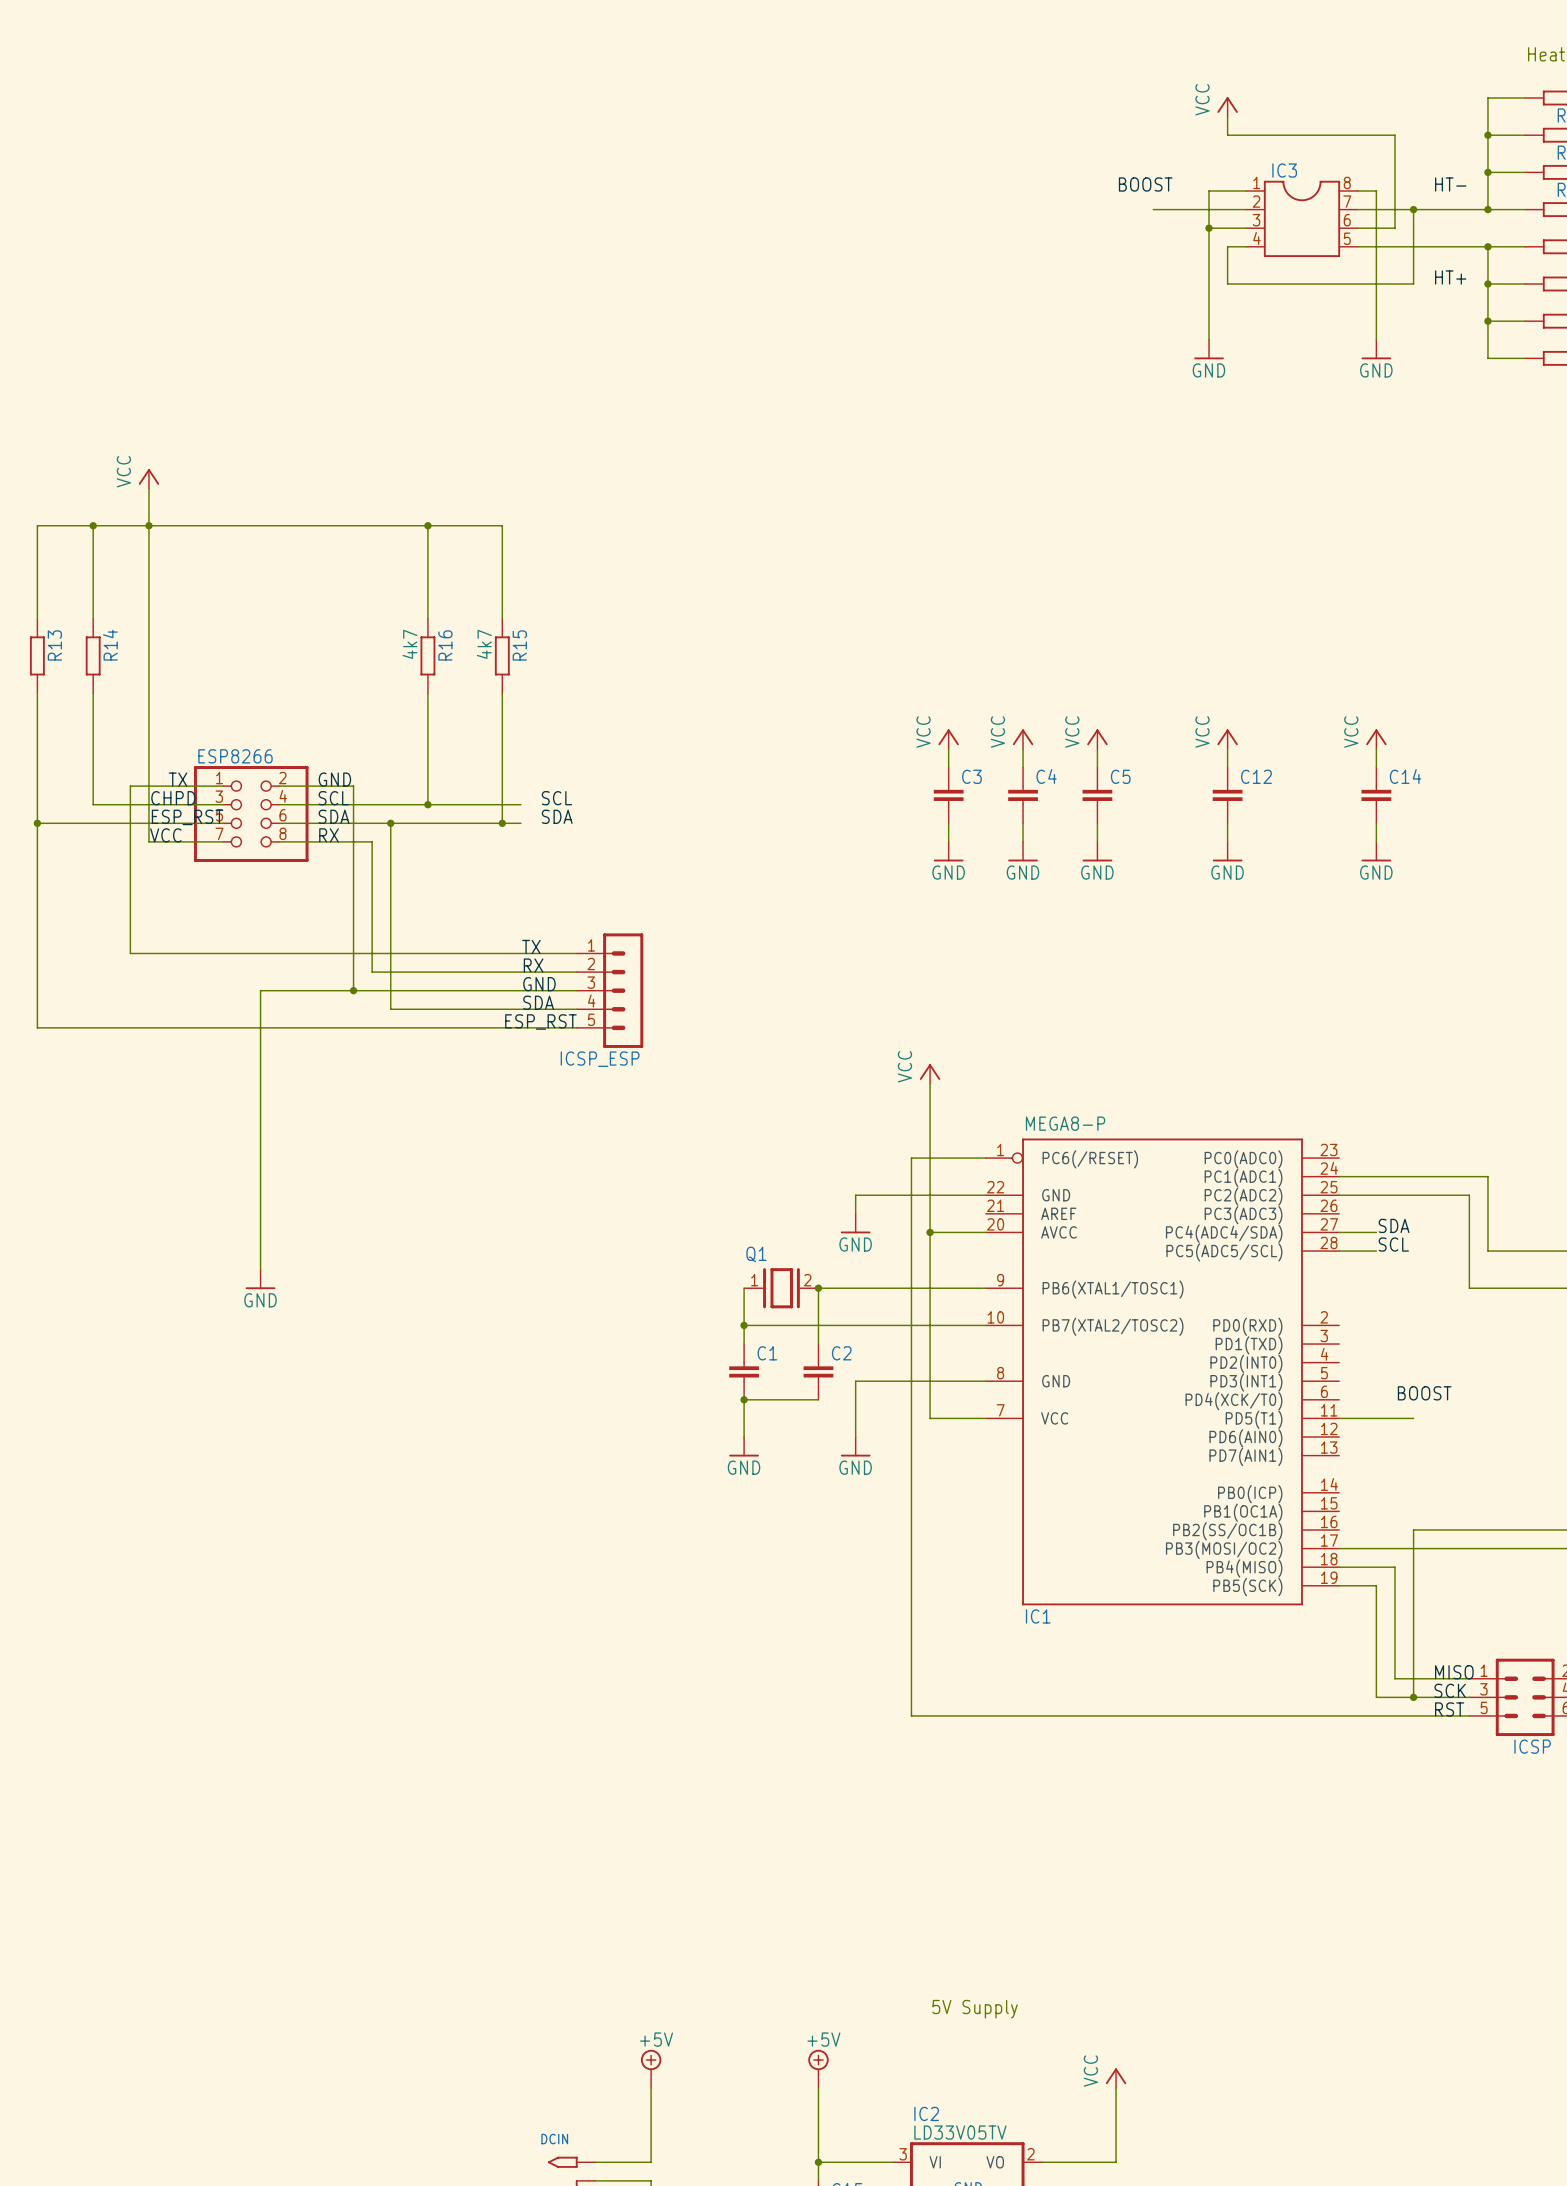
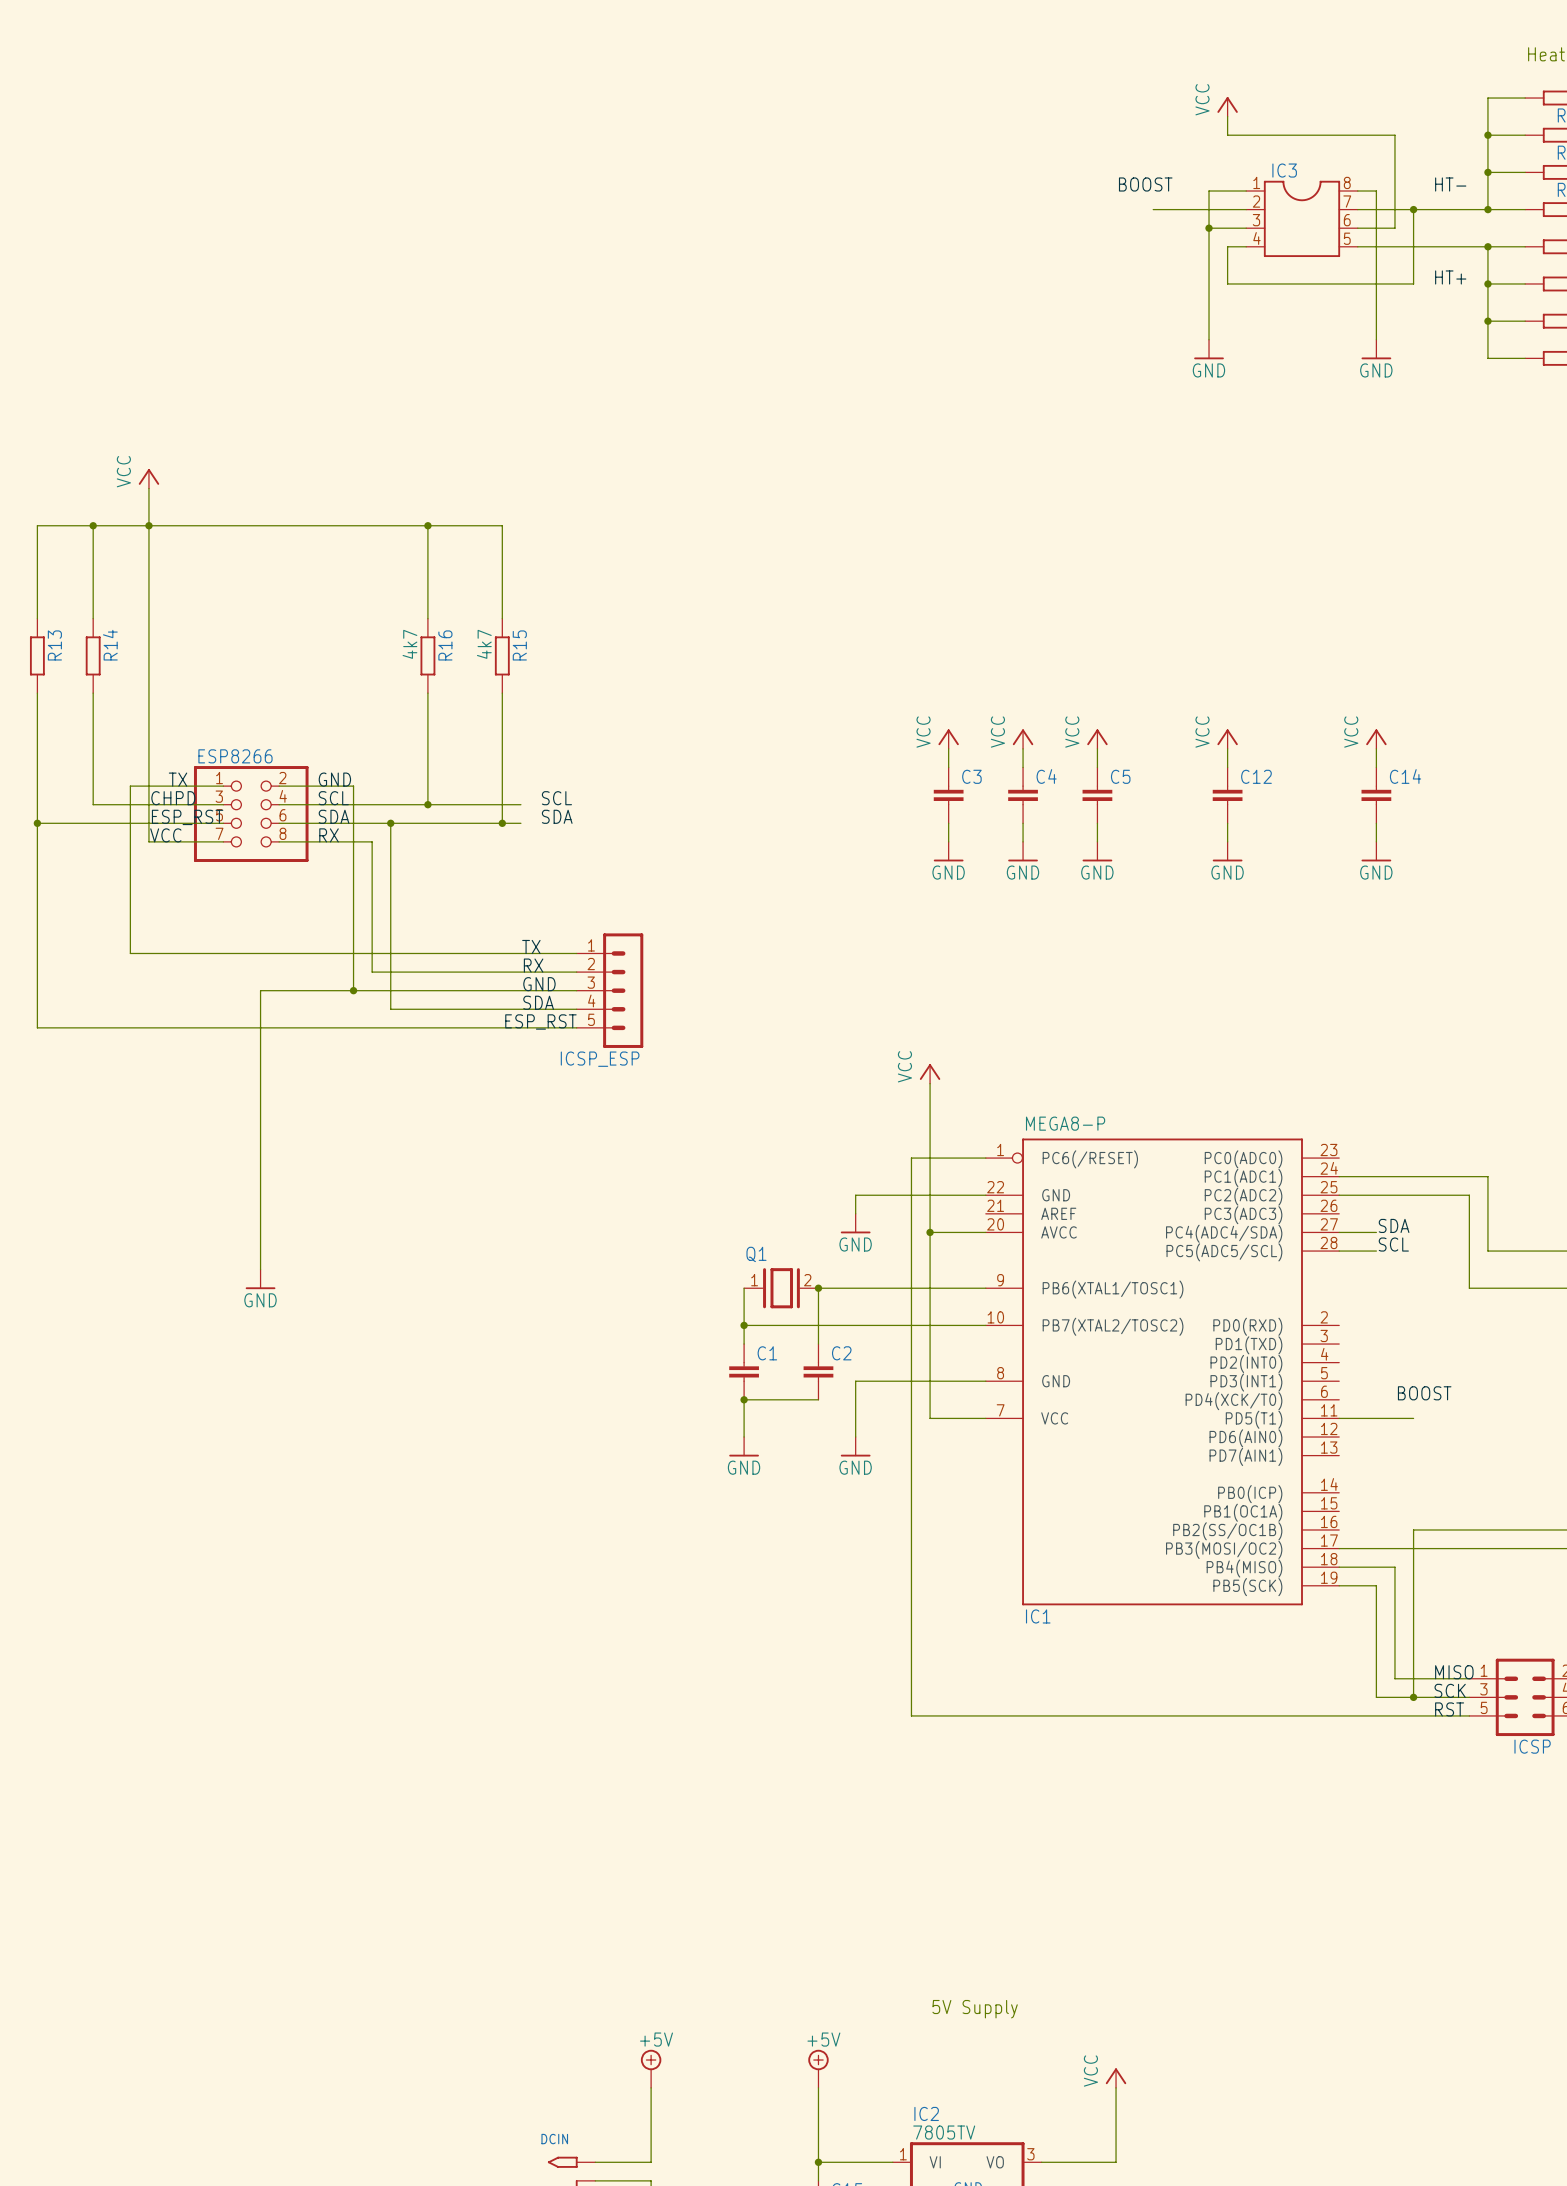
IC2 value: LD33V05TV (960, 2132) -> 7805TV (944, 2132)
IC2 pin number: 3 (903, 2154) -> 1 (903, 2154)
IC2 pin number: 2 (1030, 2154) -> 3 (1030, 2154)

